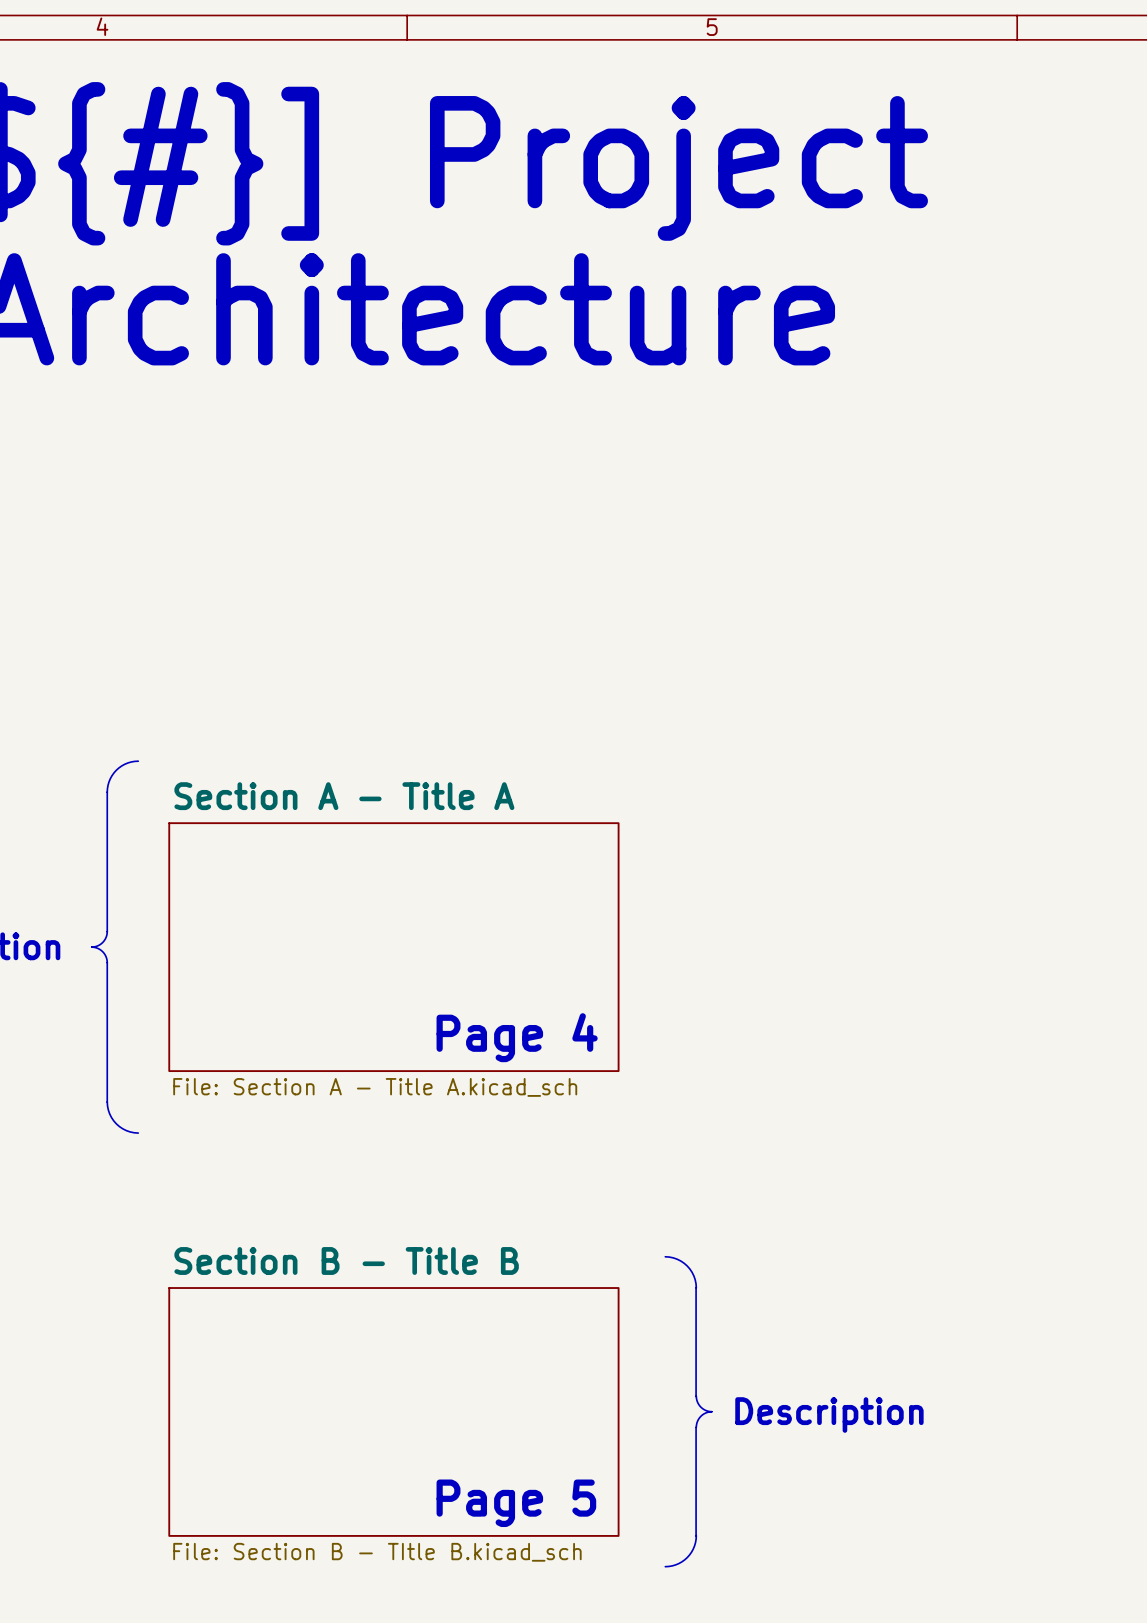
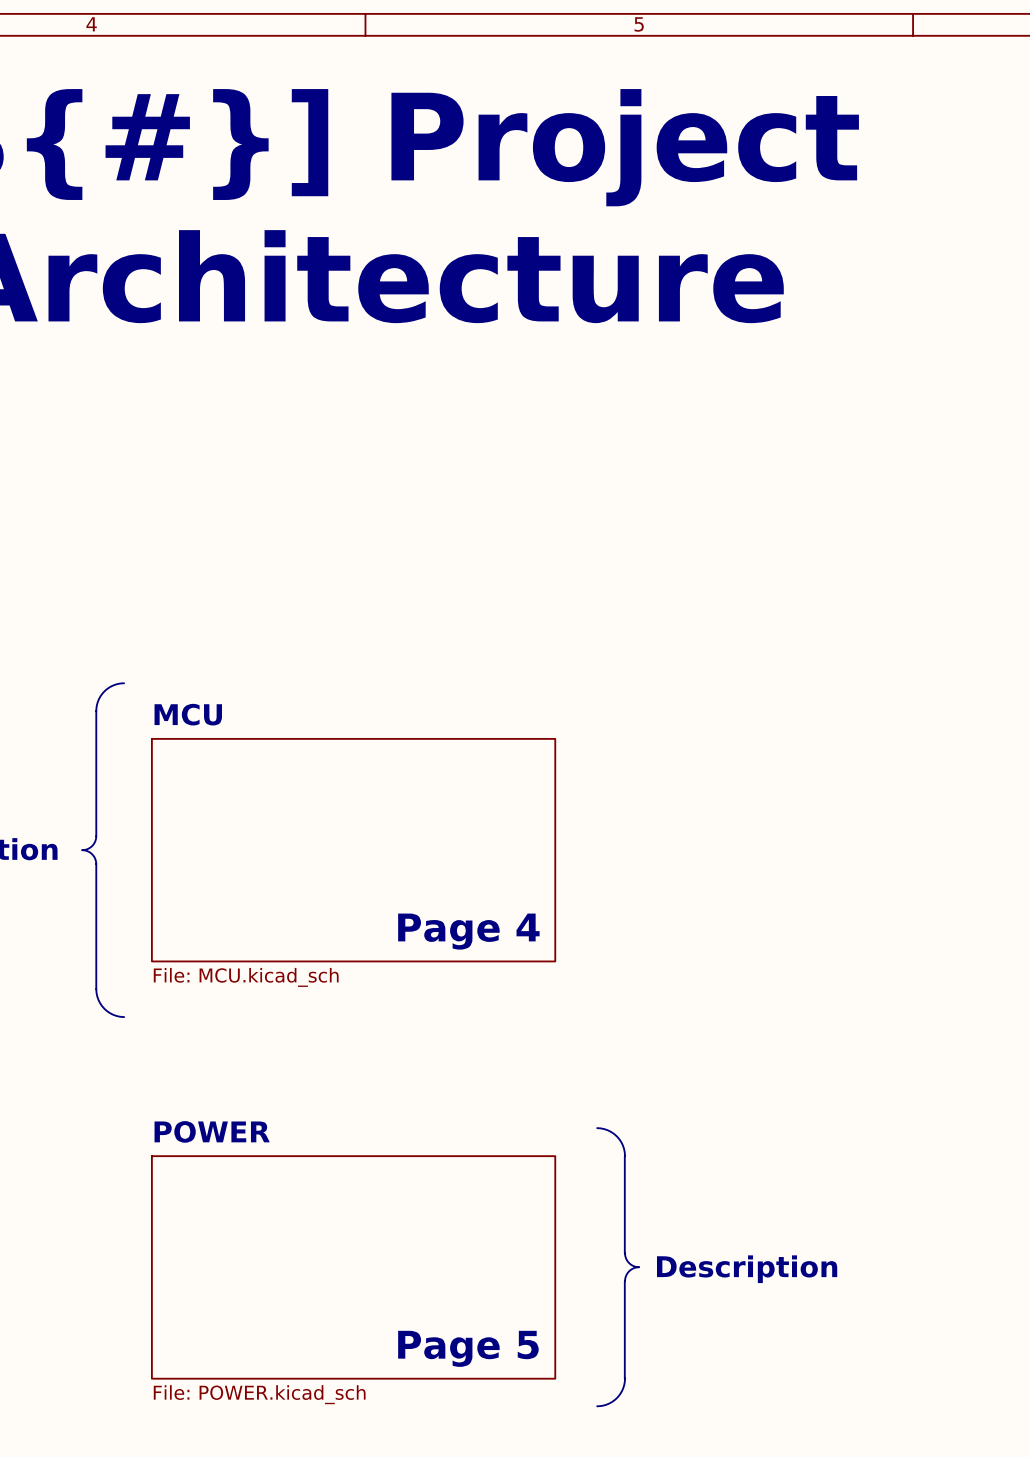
sheet Section A - Title A name: Section A - Title A (344, 796) -> MCU (188, 714)
sheet Section A - Title A value: File: Section A - Title A.kicad_sch (375, 1087) -> File: MCU.kicad_sch (246, 977)
sheet Section B - Title B name: Section B - Title B (346, 1260) -> POWER (212, 1131)
sheet Section B - Title B value: File: Section B - TItle B.kicad_sch (377, 1552) -> File: POWER.kicad_sch (259, 1394)

